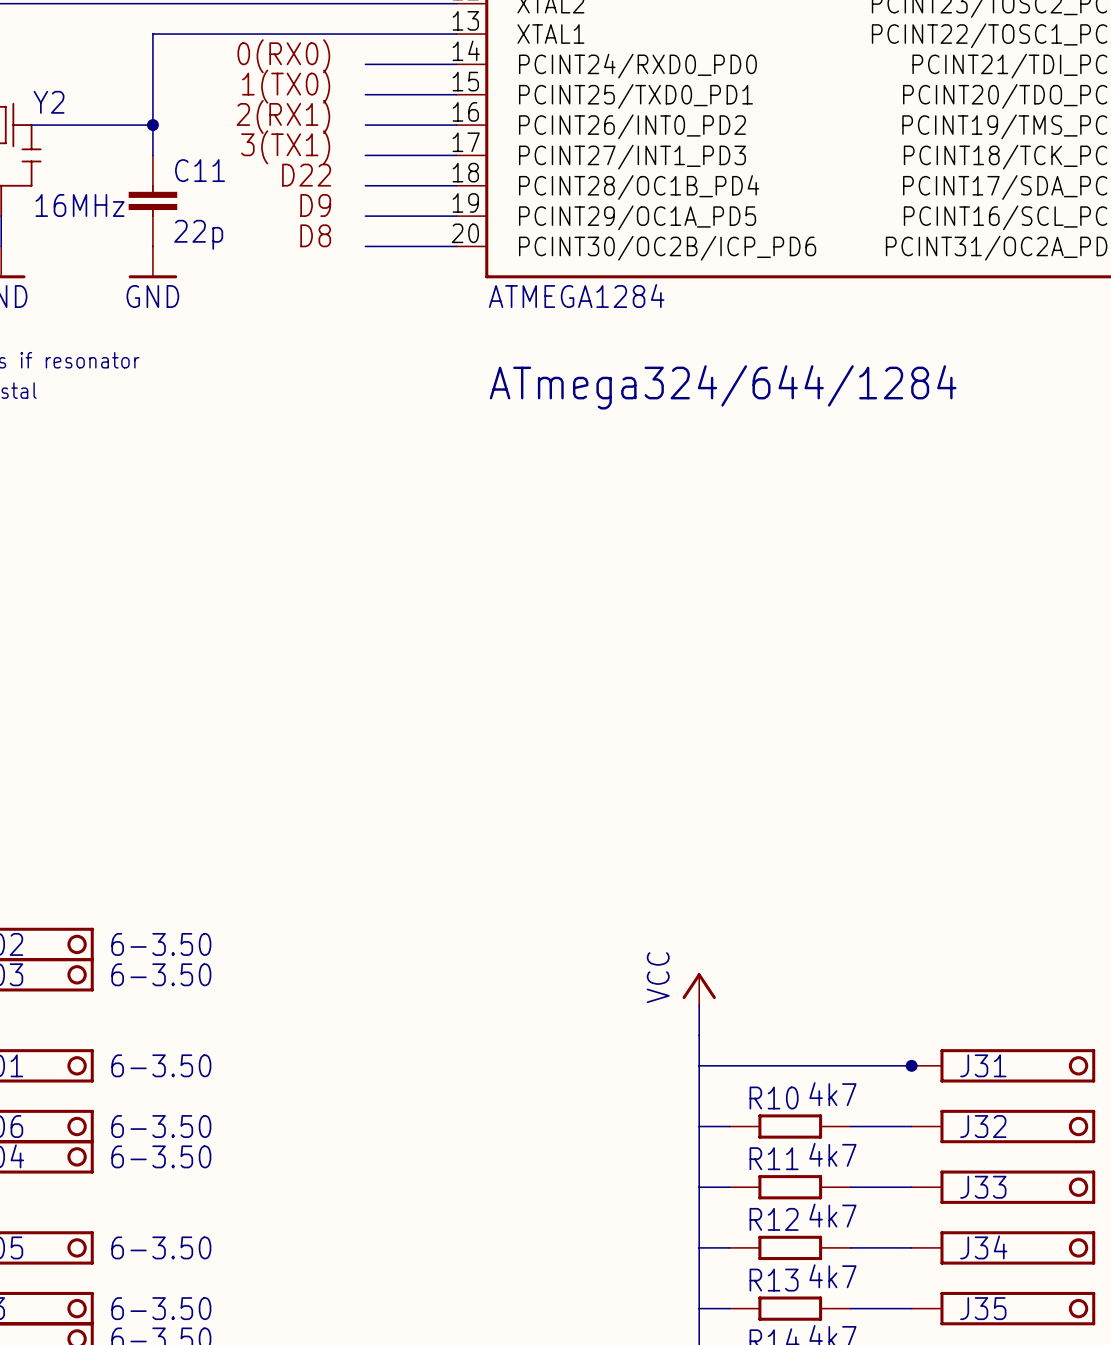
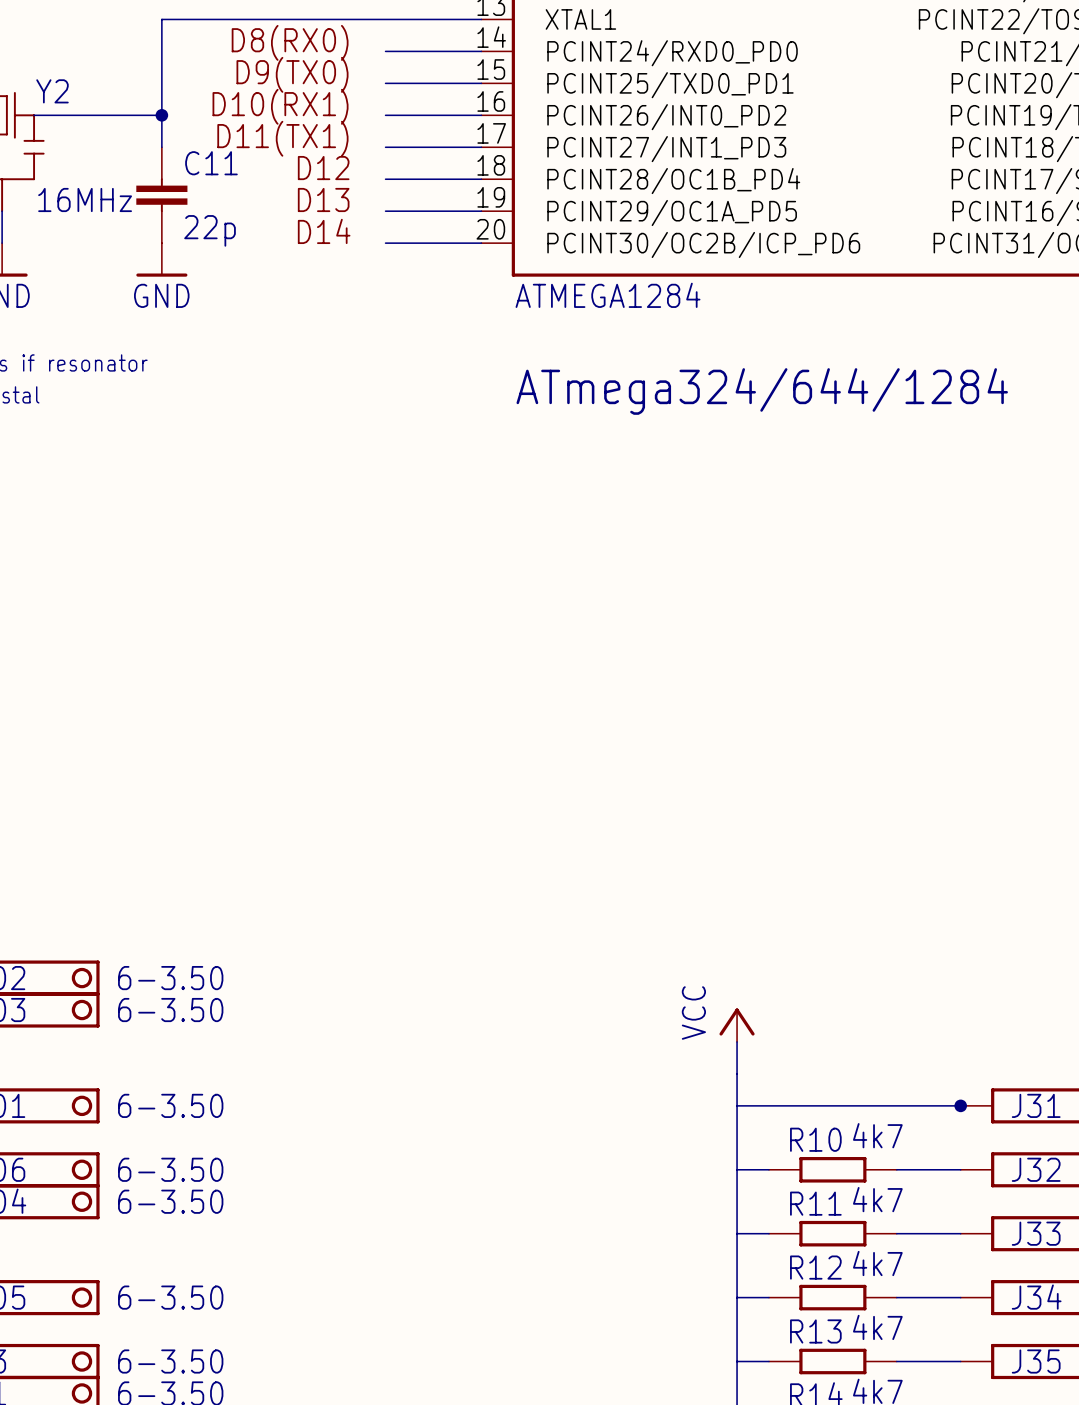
label: 0(RX0) (283, 56) -> D8(RX0) (290, 42)
label: 1(TX0) (286, 86) -> D9(TX0) (292, 74)
label: 2(RX1) (283, 116) -> D10(RX1) (280, 106)
label: 3(TX1) (285, 147) -> D11(TX1) (282, 138)
label: D22 (306, 175) -> D12 (323, 168)
label: D9 (315, 205) -> D13 (323, 199)
label: D8 (315, 235) -> D14 (324, 231)

